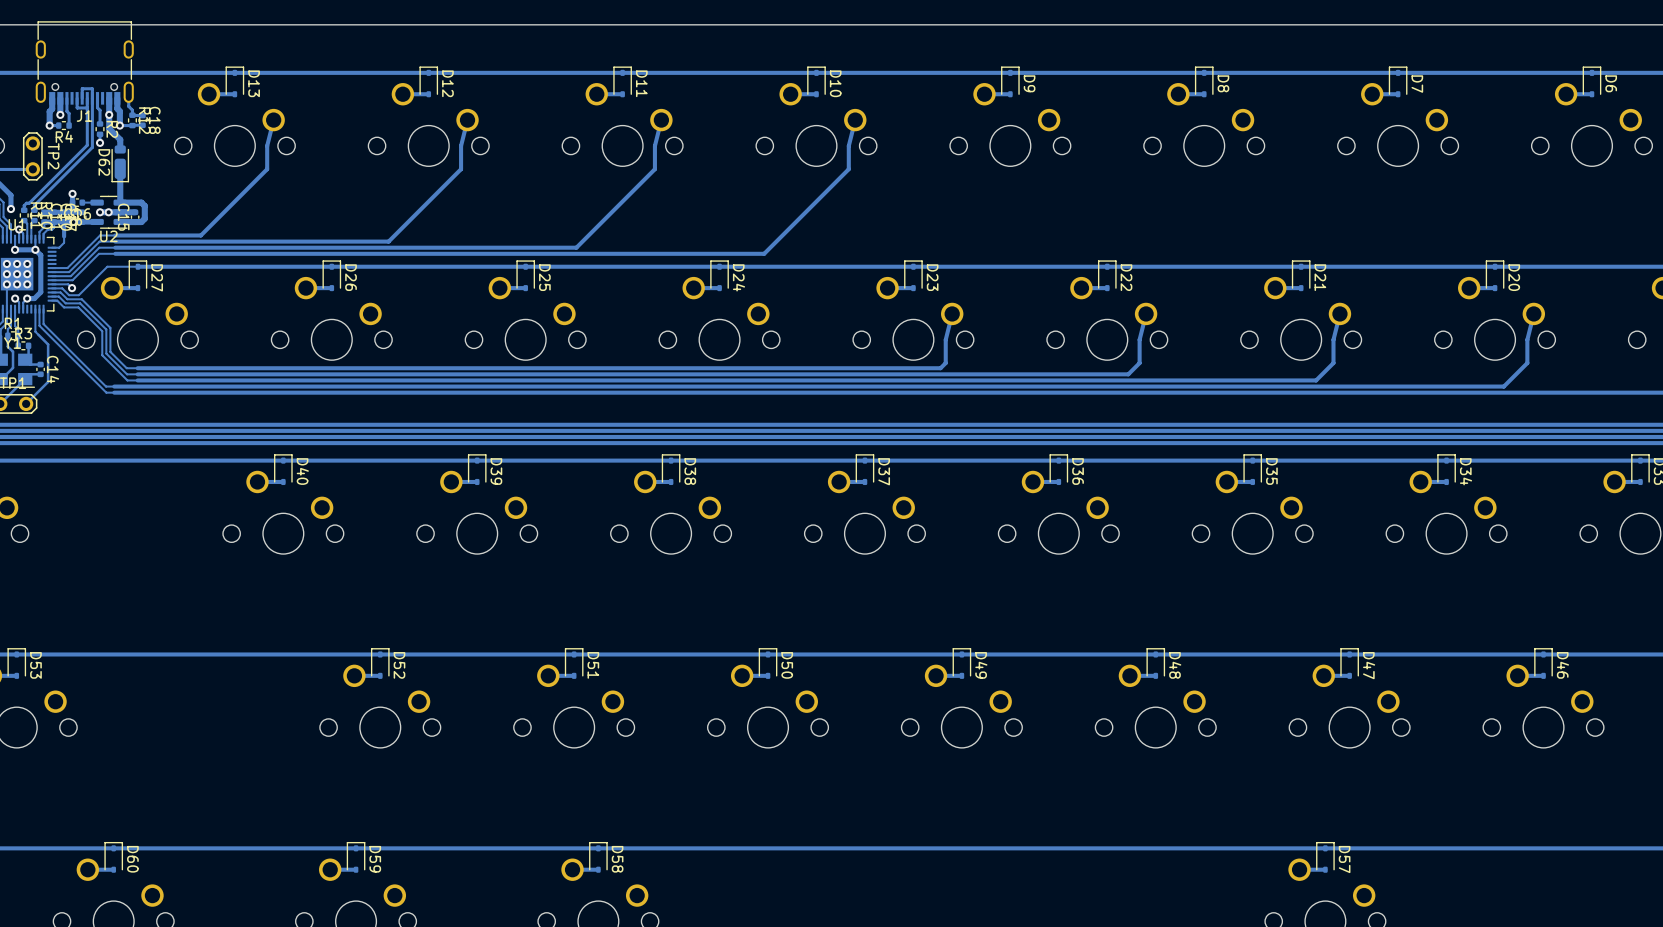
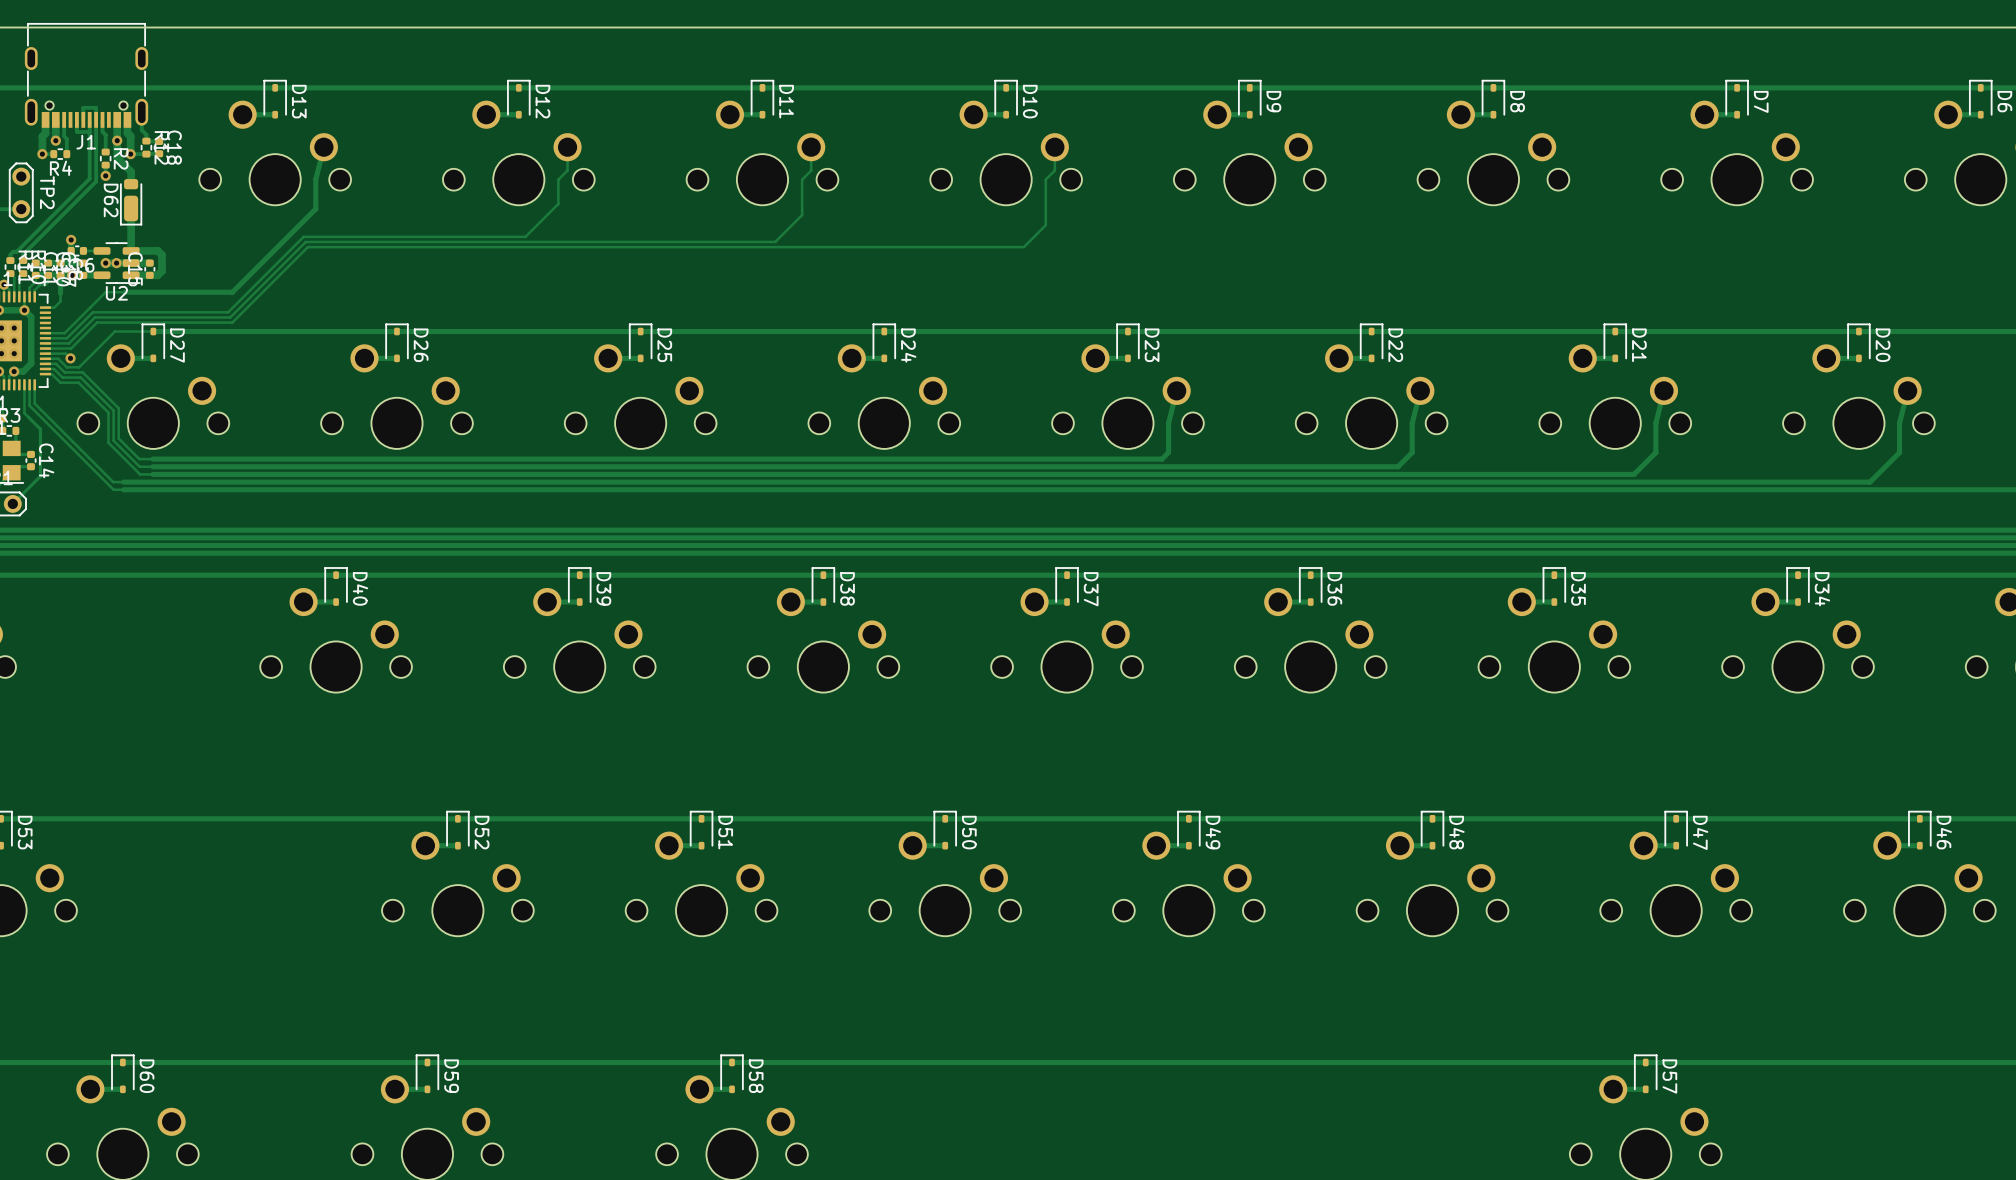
track: (467, 120) (461, 145) (461, 169) (388, 241) (99, 241) (89, 251) -> (567, 147) (567, 170) (558, 179) (558, 203) (525, 236) (303, 236) (228, 312) (92, 312)
track: (661, 120) (654, 145) (654, 169) (576, 247) (99, 247) (91, 255) -> (811, 147) (811, 170) (802, 179) (802, 215) (775, 241) (305, 241) (230, 317) (94, 317)
track: (855, 120) (848, 145) (848, 169) (764, 253) (98, 253) (93, 259) -> (1054, 147) (1054, 170) (1045, 179) (1045, 225) (1023, 247) (307, 247) (232, 322) (97, 322)

